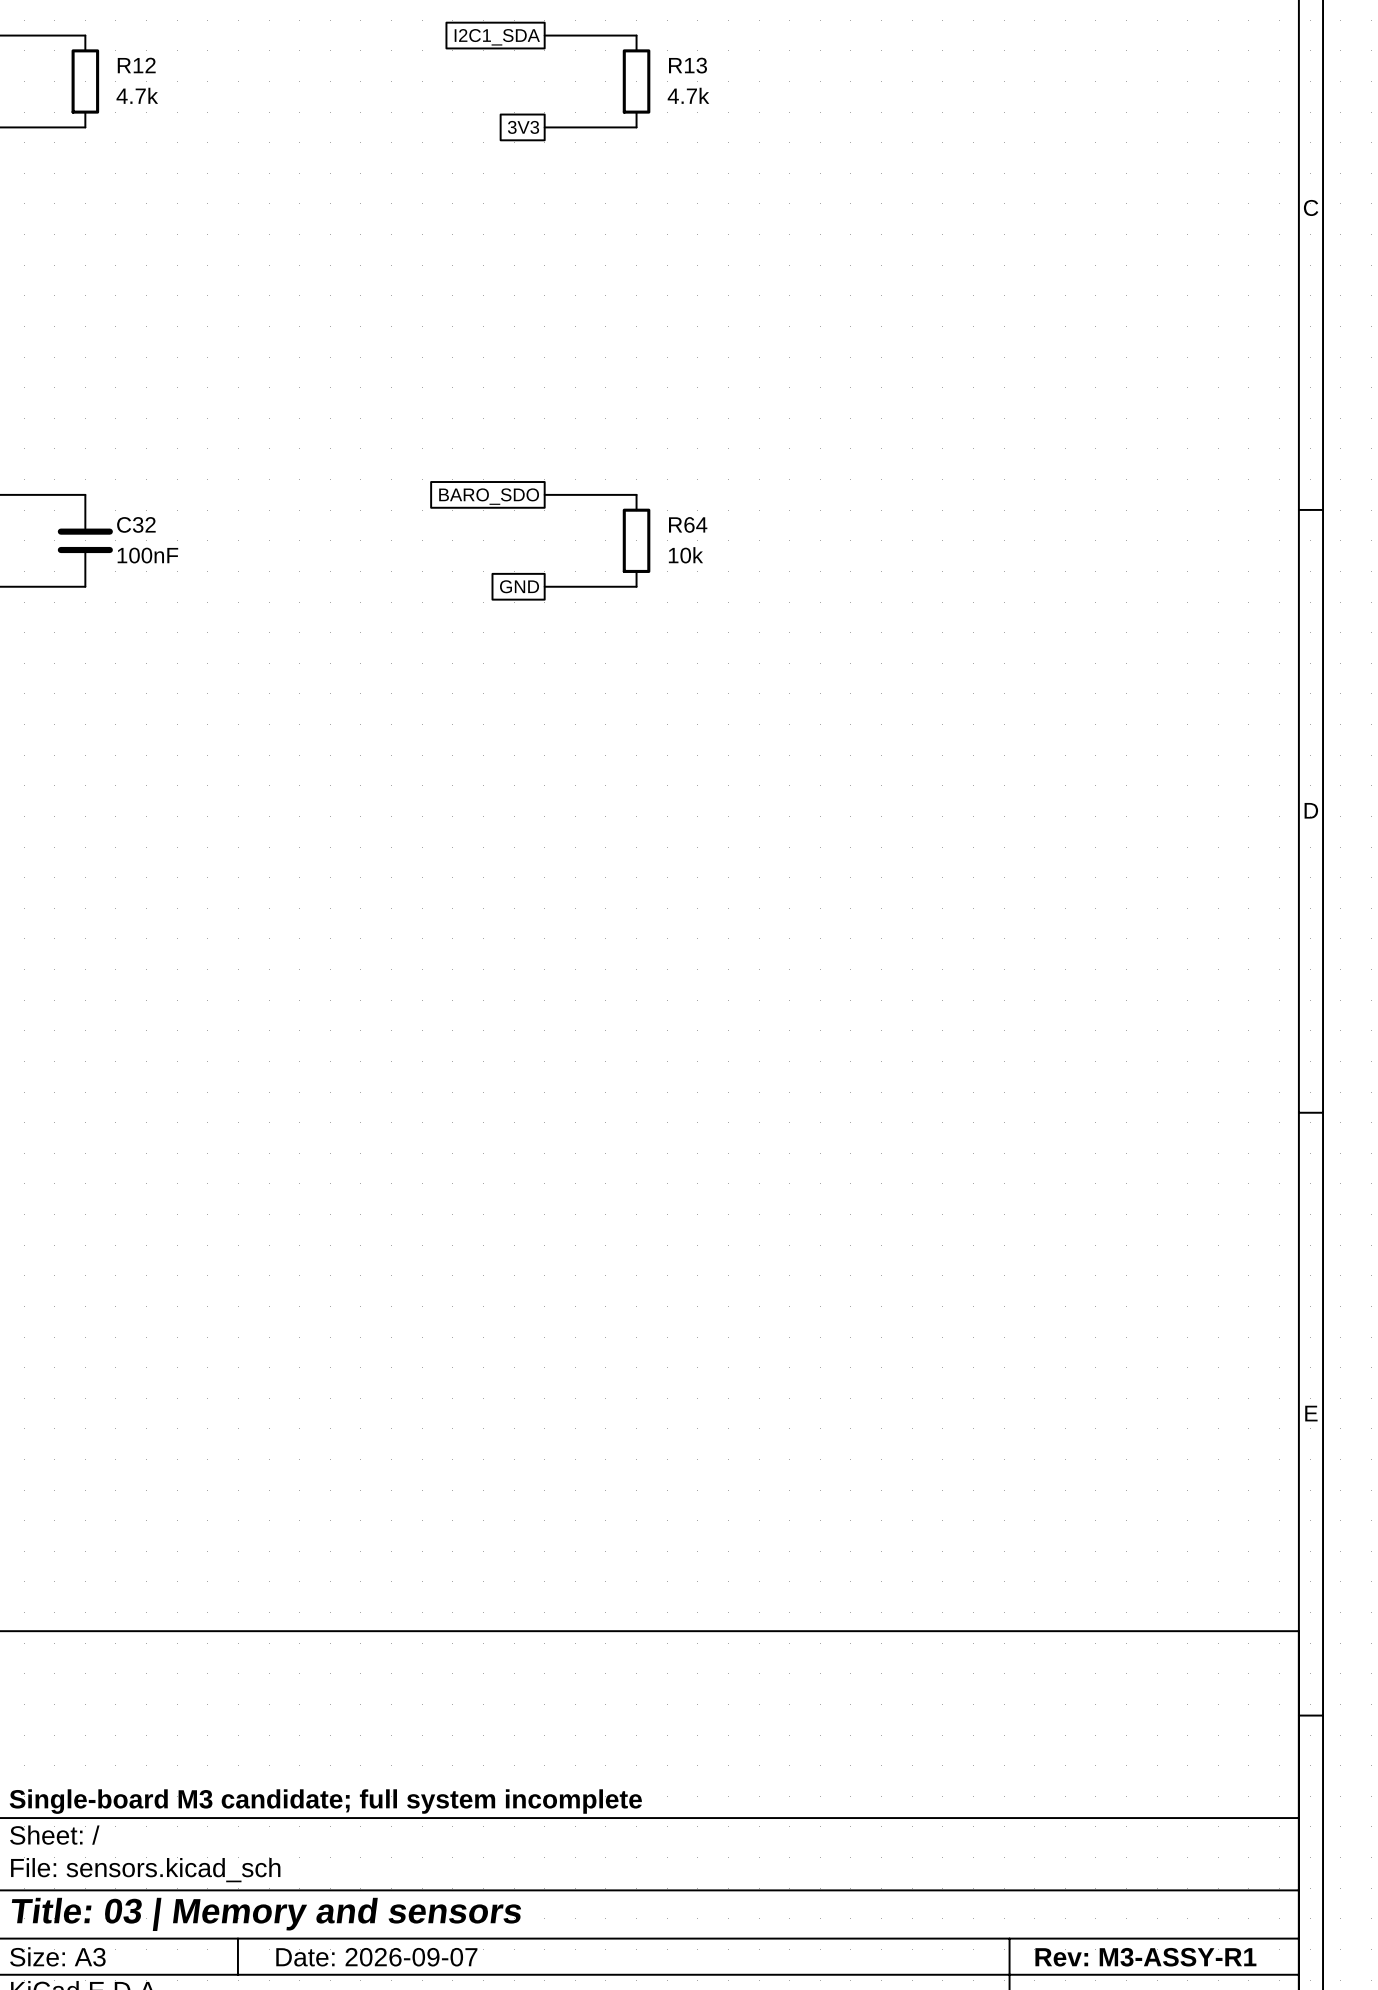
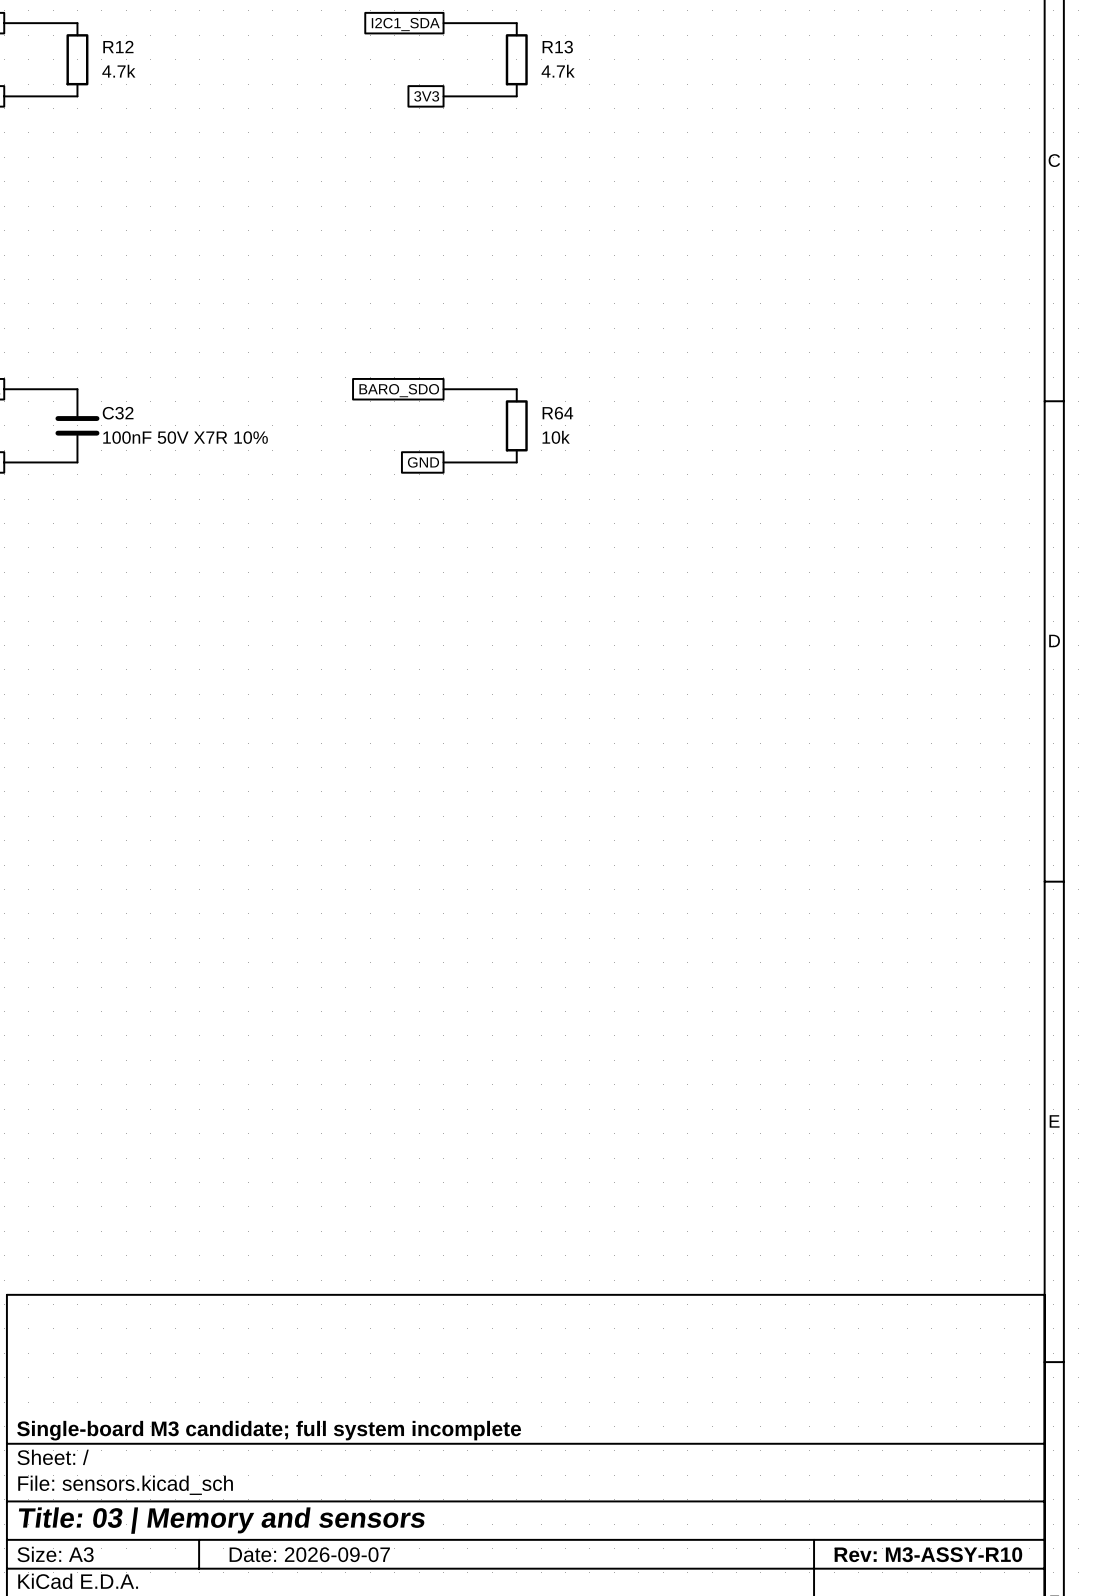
C32 value: 100nF (147, 555) -> 100nF 50V X7R 10% (185, 437)
title block: Rev: M3-ASSY-R1 (1145, 1957) -> Rev: M3-ASSY-R10 (928, 1554)

